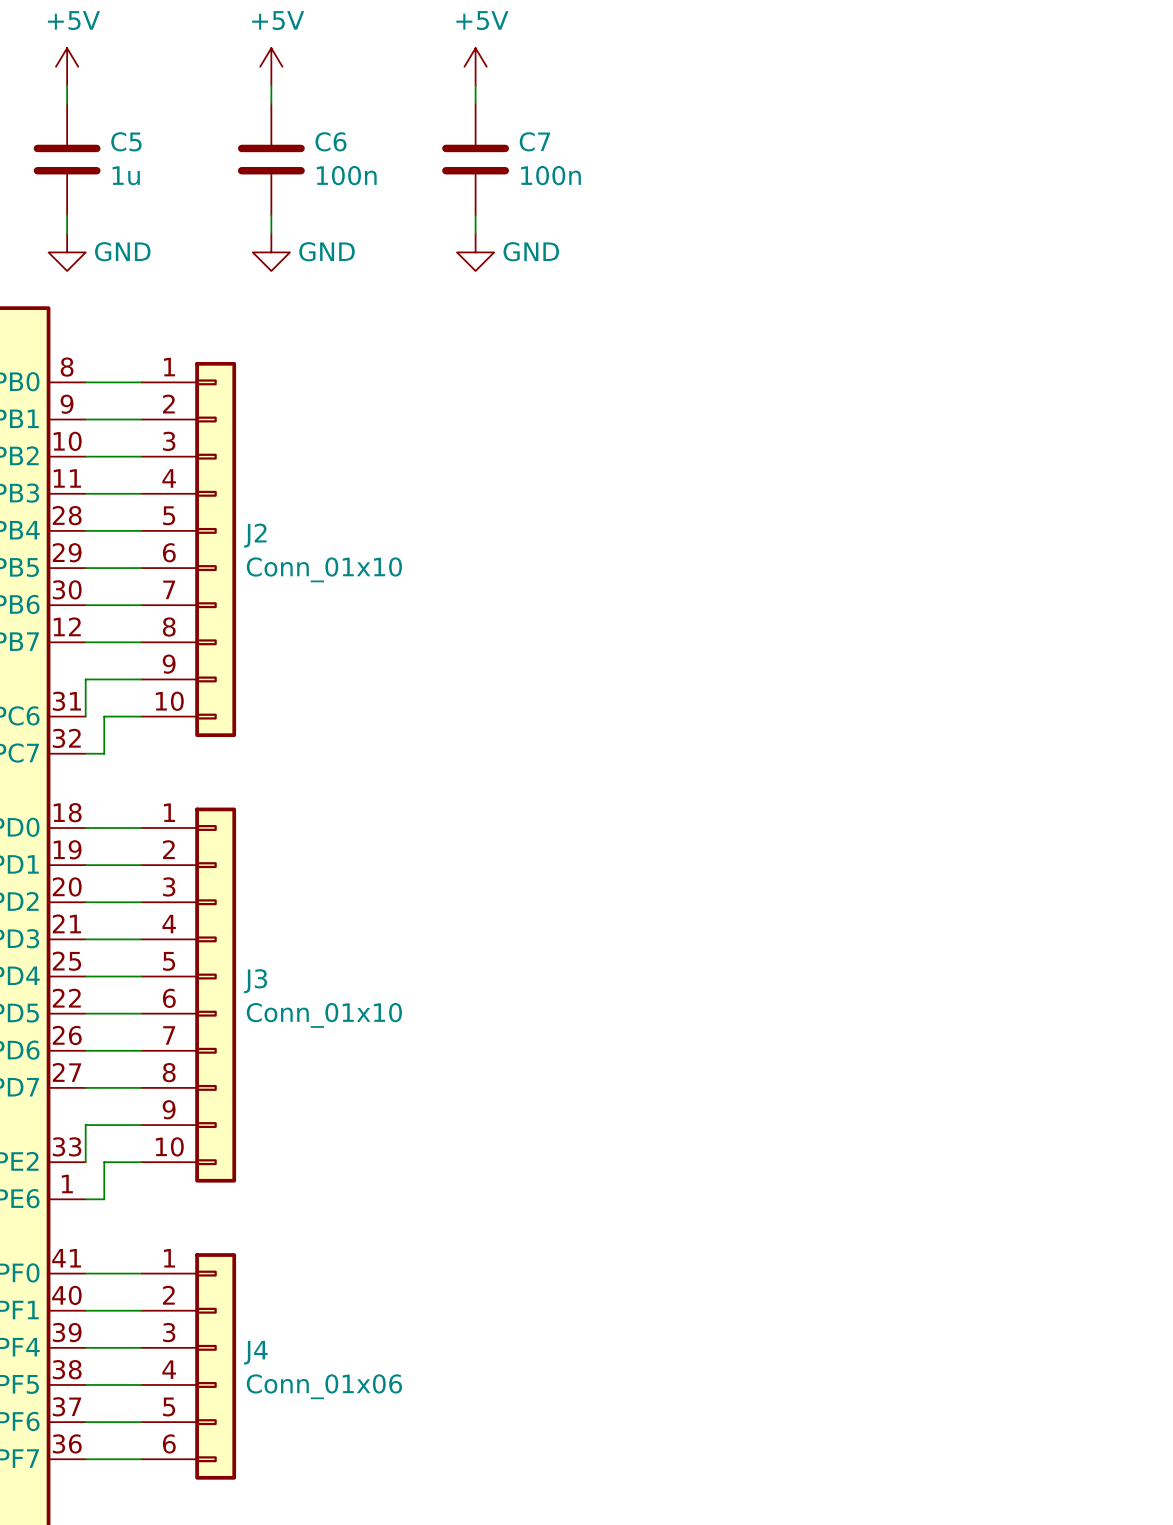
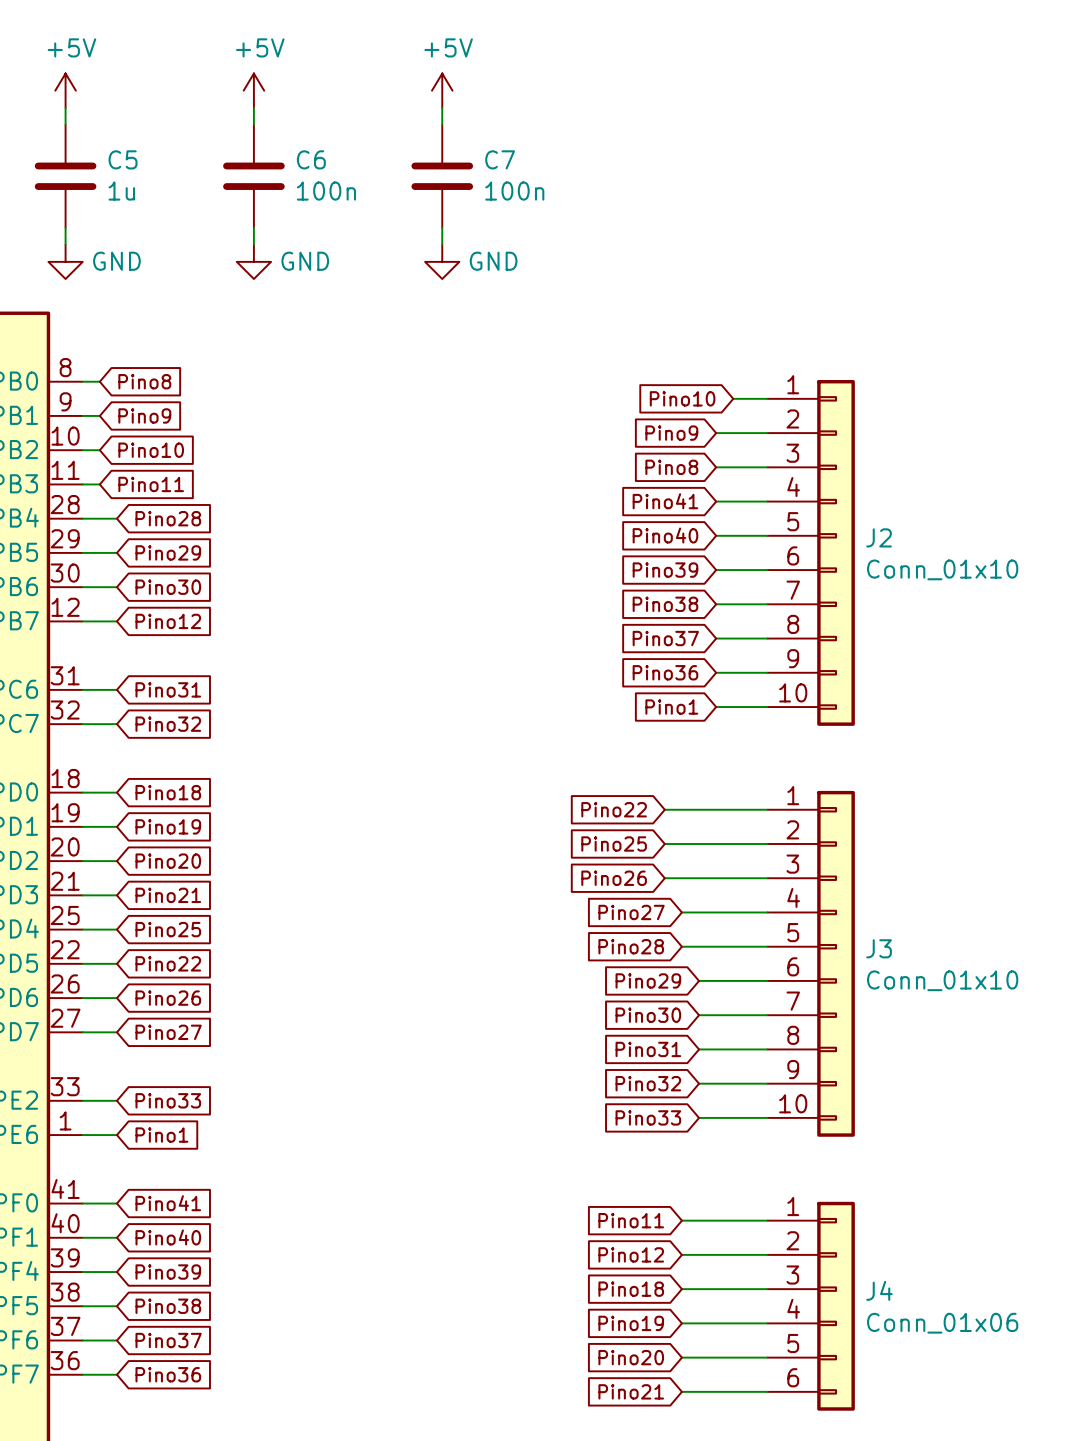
wire: (104, 382) (141, 382) -> none
global label: none -> Pino8 (144, 381)
global label: none -> Pino10 (682, 398)
wire: none -> (733, 398) (767, 398)
wire: (104, 419) (141, 419) -> none
global label: none -> Pino9 (144, 415)
global label: none -> Pino9 (671, 433)
wire: none -> (716, 433) (767, 433)
wire: (104, 456) (141, 456) -> none
global label: none -> Pino10 (151, 450)
global label: none -> Pino8 (671, 467)
wire: none -> (716, 467) (767, 467)
wire: (104, 493) (141, 493) -> none
global label: none -> Pino11 (151, 484)
global label: none -> Pino41 (665, 501)
wire: none -> (716, 501) (767, 501)
wire: (122, 530) (141, 530) -> none
global label: none -> Pino28 (168, 518)
J2 position: (188, 549) -> (811, 552)
global label: none -> Pino40 (665, 535)
wire: none -> (716, 535) (767, 535)
global label: none -> Pino29 (168, 552)
wire: (122, 568) (141, 568) -> none
global label: none -> Pino39 (665, 570)
wire: none -> (716, 570) (767, 570)
wire: (122, 605) (141, 605) -> none
global label: none -> Pino30 (168, 587)
global label: none -> Pino38 (665, 604)
wire: none -> (716, 604) (767, 604)
wire: (122, 642) (141, 642) -> none
global label: none -> Pino12 (168, 621)
global label: none -> Pino37 (665, 638)
wire: none -> (716, 638) (767, 638)
wire: (141, 679) (85, 679) (85, 716) -> none
global label: none -> Pino36 (665, 672)
wire: none -> (716, 672) (767, 672)
wire: (104, 716) (104, 753) -> (99, 689) (82, 689)
wire: (122, 716) (141, 716) -> (99, 724) (116, 724)
global label: none -> Pino31 (168, 689)
global label: none -> Pino1 (671, 707)
wire: none -> (716, 707) (767, 707)
global label: none -> Pino32 (168, 724)
wire: (122, 827) (141, 827) -> none
global label: none -> Pino18 (168, 792)
global label: none -> Pino22 (614, 809)
wire: none -> (664, 809) (767, 809)
global label: none -> Pino19 (168, 826)
wire: (122, 865) (141, 865) -> none
global label: none -> Pino25 (614, 843)
wire: none -> (664, 843) (767, 843)
wire: (122, 902) (141, 902) -> none
global label: none -> Pino20 (168, 861)
global label: none -> Pino26 (614, 878)
wire: none -> (664, 878) (767, 878)
wire: (122, 939) (141, 939) -> none
global label: none -> Pino21 (168, 895)
global label: none -> Pino27 (631, 912)
wire: none -> (681, 912) (767, 912)
wire: (122, 976) (141, 976) -> none
global label: none -> Pino25 (168, 929)
global label: none -> Pino28 (631, 946)
J3 position: (188, 995) -> (811, 963)
wire: none -> (681, 946) (767, 946)
wire: (122, 1013) (141, 1013) -> none
global label: none -> Pino22 (168, 963)
global label: none -> Pino29 (648, 980)
wire: none -> (699, 980) (767, 980)
wire: (122, 1050) (141, 1050) -> none
global label: none -> Pino26 (168, 998)
global label: none -> Pino30 (648, 1015)
wire: none -> (699, 1015) (767, 1015)
wire: (122, 1087) (141, 1087) -> none
global label: none -> Pino27 (168, 1032)
global label: none -> Pino31 (648, 1049)
wire: none -> (699, 1049) (767, 1049)
wire: (141, 1125) (85, 1125) (85, 1162) -> none
global label: none -> Pino32 (648, 1083)
wire: none -> (699, 1083) (767, 1083)
wire: (104, 1162) (104, 1199) -> (99, 1100) (82, 1100)
wire: (122, 1162) (141, 1162) -> (99, 1135) (116, 1135)
global label: none -> Pino33 (168, 1100)
global label: none -> Pino33 (648, 1117)
wire: none -> (699, 1117) (767, 1117)
global label: none -> Pino1 (161, 1135)
wire: (122, 1273) (141, 1273) -> none
global label: none -> Pino41 (168, 1203)
global label: none -> Pino11 (631, 1220)
wire: none -> (681, 1220) (767, 1220)
wire: (122, 1310) (141, 1310) -> none
global label: none -> Pino40 (168, 1237)
global label: none -> Pino12 (631, 1254)
wire: none -> (681, 1254) (767, 1254)
wire: (122, 1347) (141, 1347) -> none
global label: none -> Pino39 (168, 1272)
J4 position: (188, 1366) -> (811, 1306)
global label: none -> Pino18 (631, 1289)
wire: none -> (681, 1289) (767, 1289)
wire: (122, 1384) (141, 1384) -> none
global label: none -> Pino38 (168, 1306)
global label: none -> Pino19 (631, 1323)
wire: none -> (681, 1323) (767, 1323)
global label: none -> Pino37 (168, 1340)
wire: (122, 1422) (141, 1422) -> none
global label: none -> Pino20 (631, 1357)
wire: none -> (681, 1357) (767, 1357)
wire: (122, 1459) (141, 1459) -> none
global label: none -> Pino36 (168, 1374)
global label: none -> Pino21 (631, 1391)
wire: none -> (681, 1391) (767, 1391)

